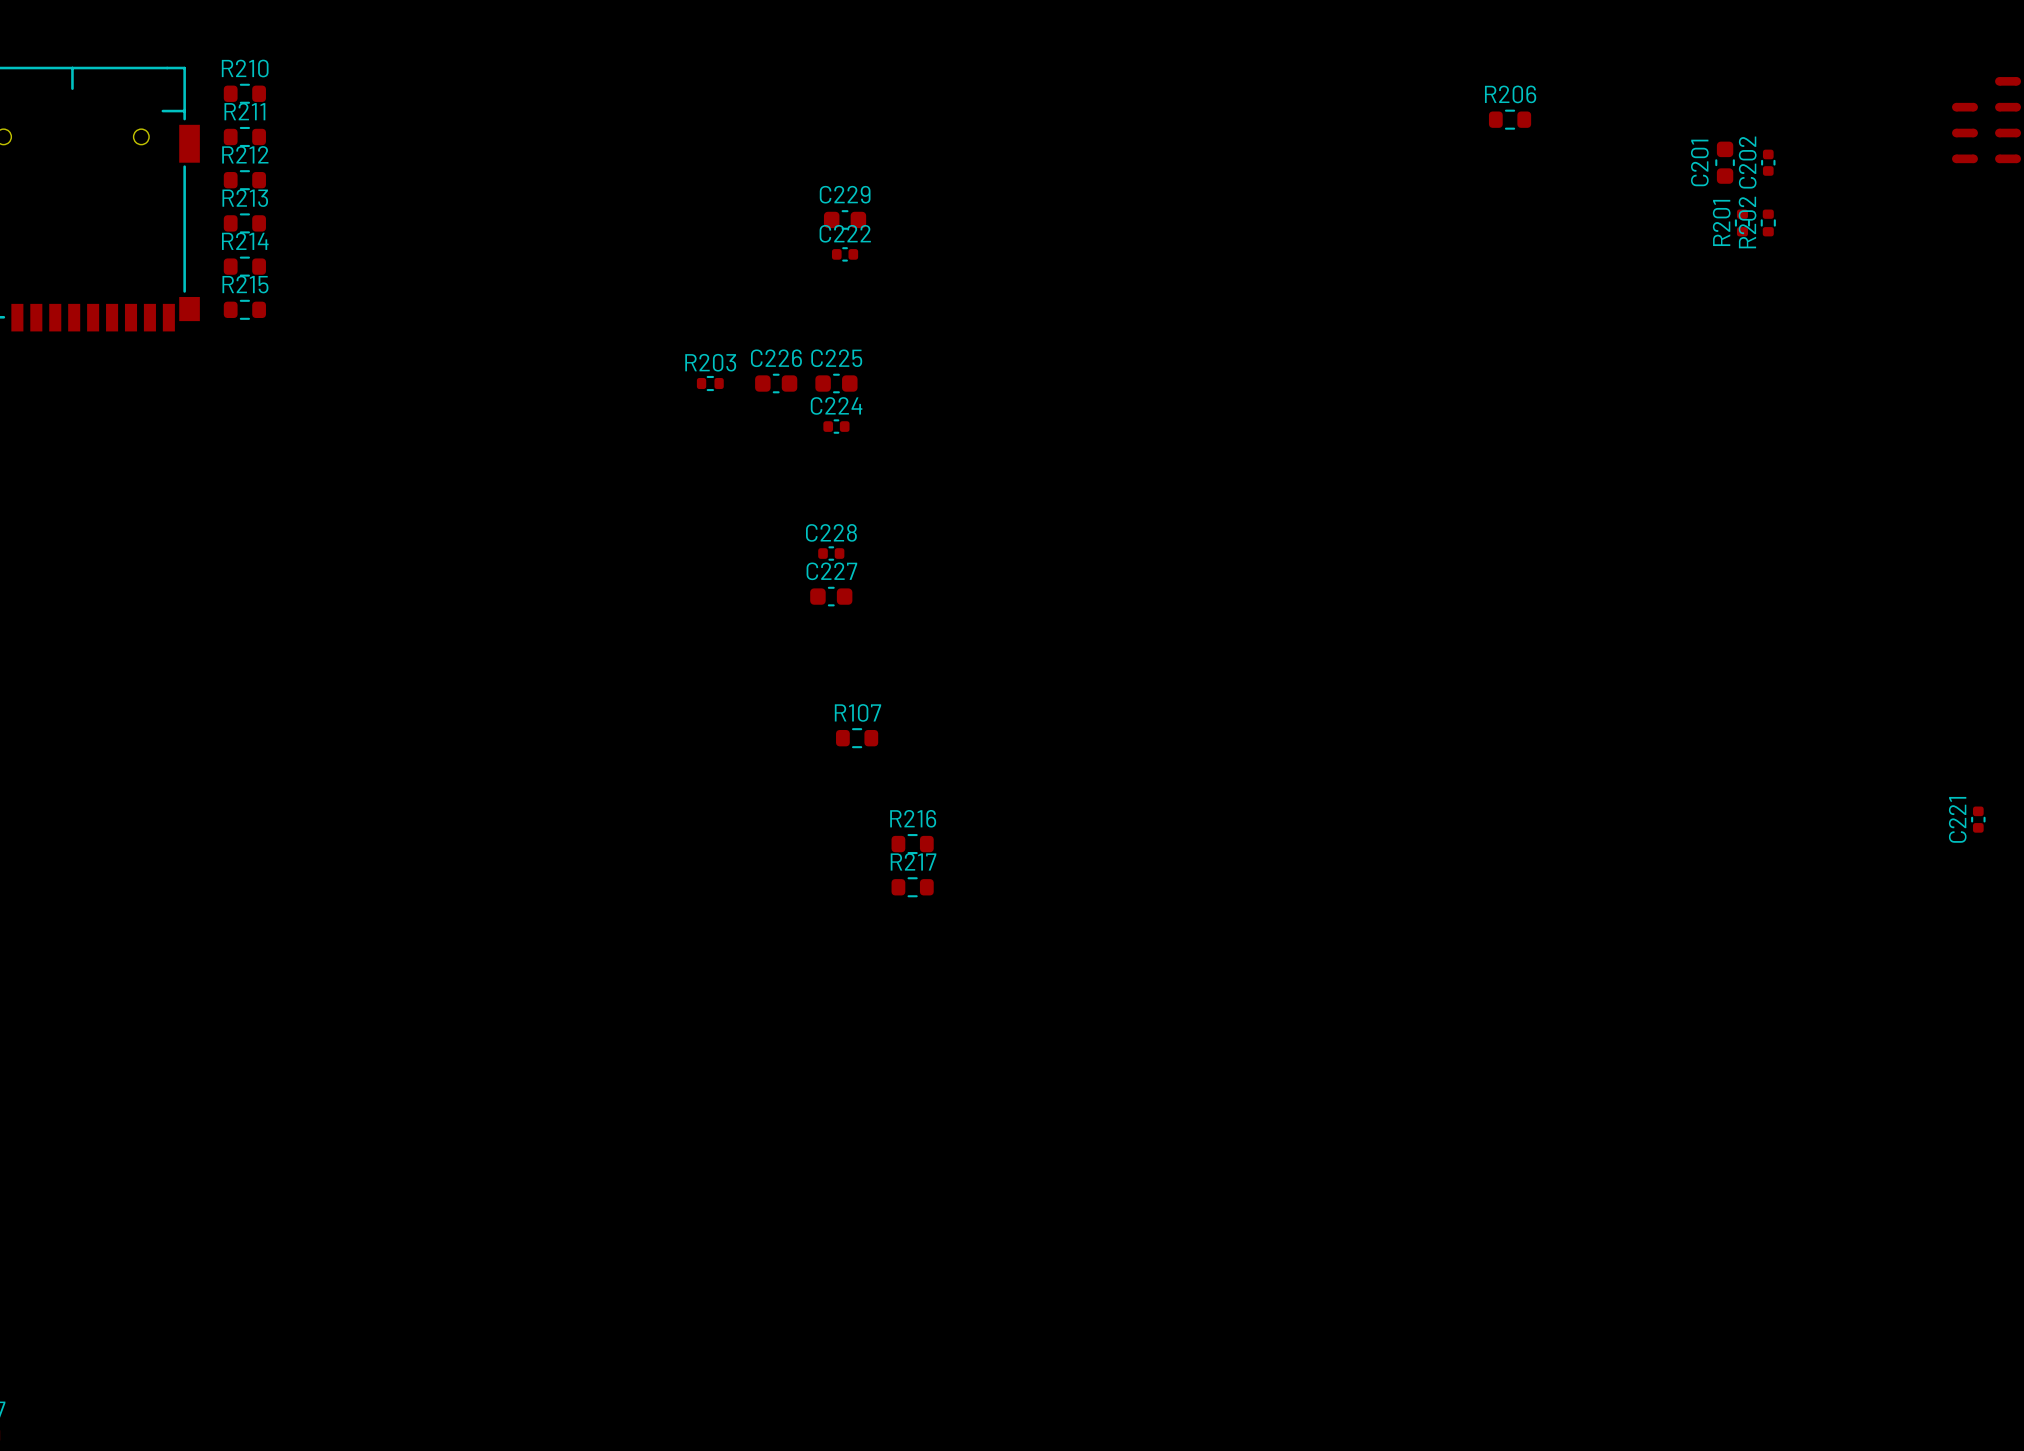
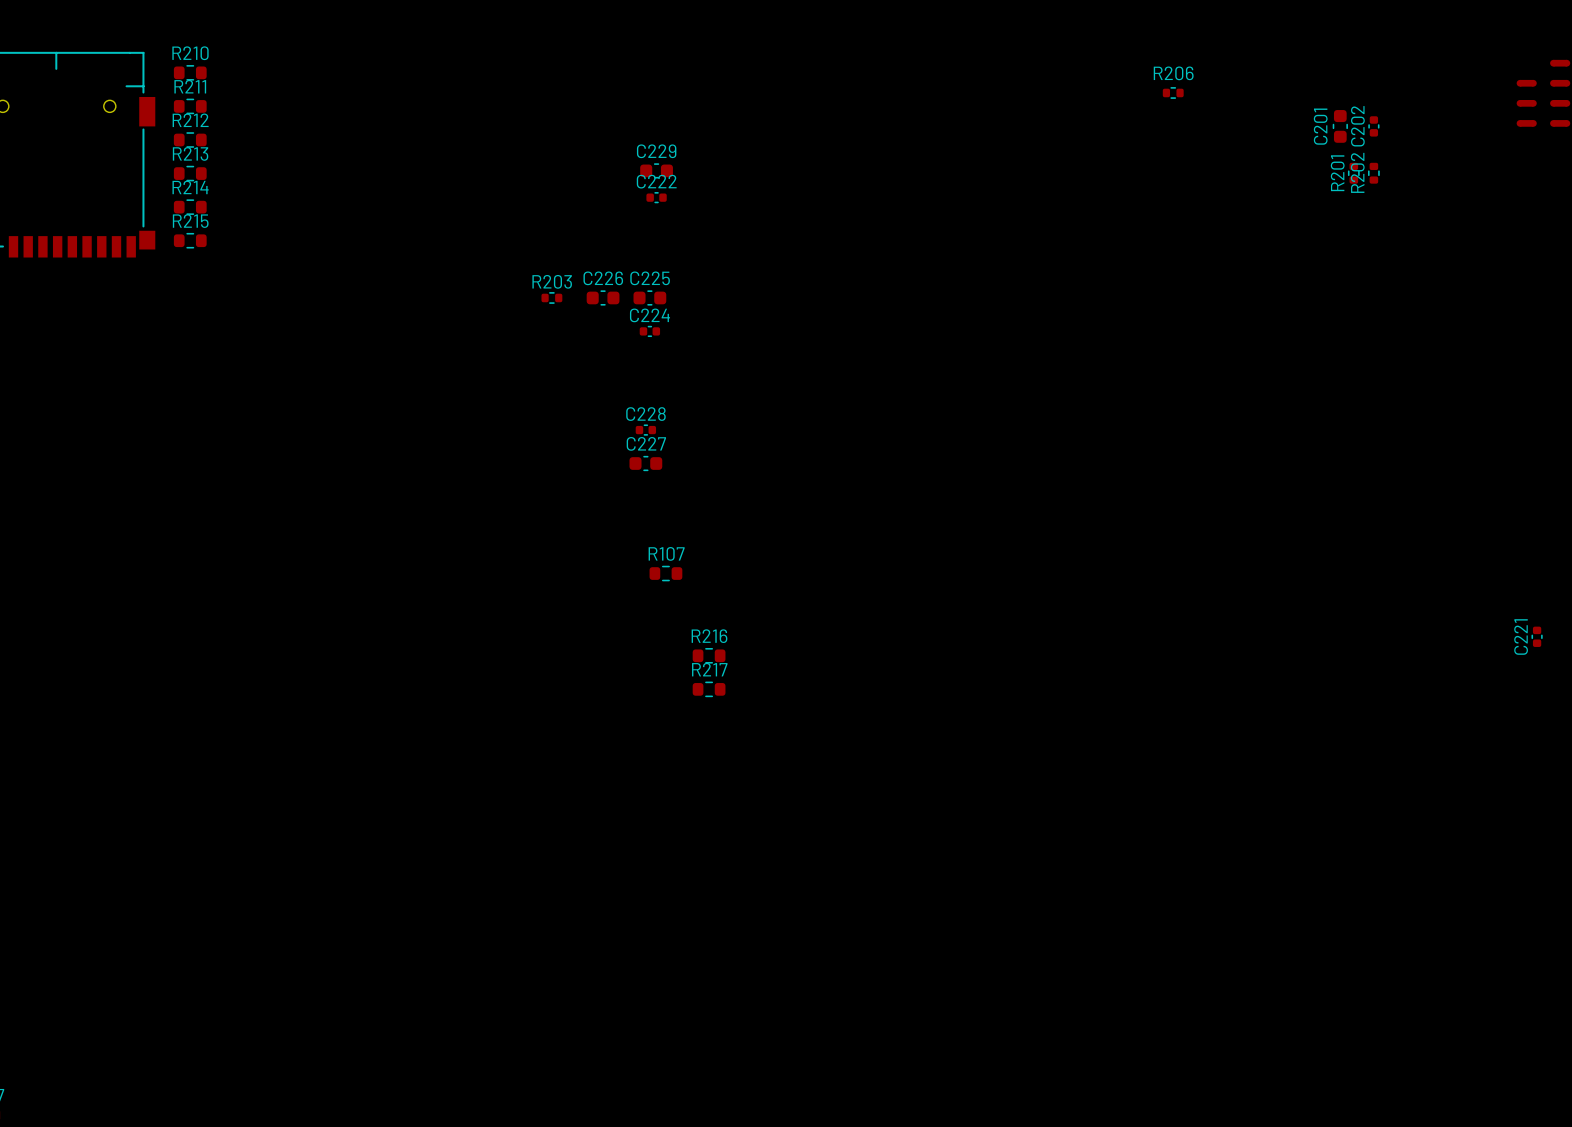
R206 footprint: [1488, 109, 1532, 130] -> [1162, 87, 1184, 99]

